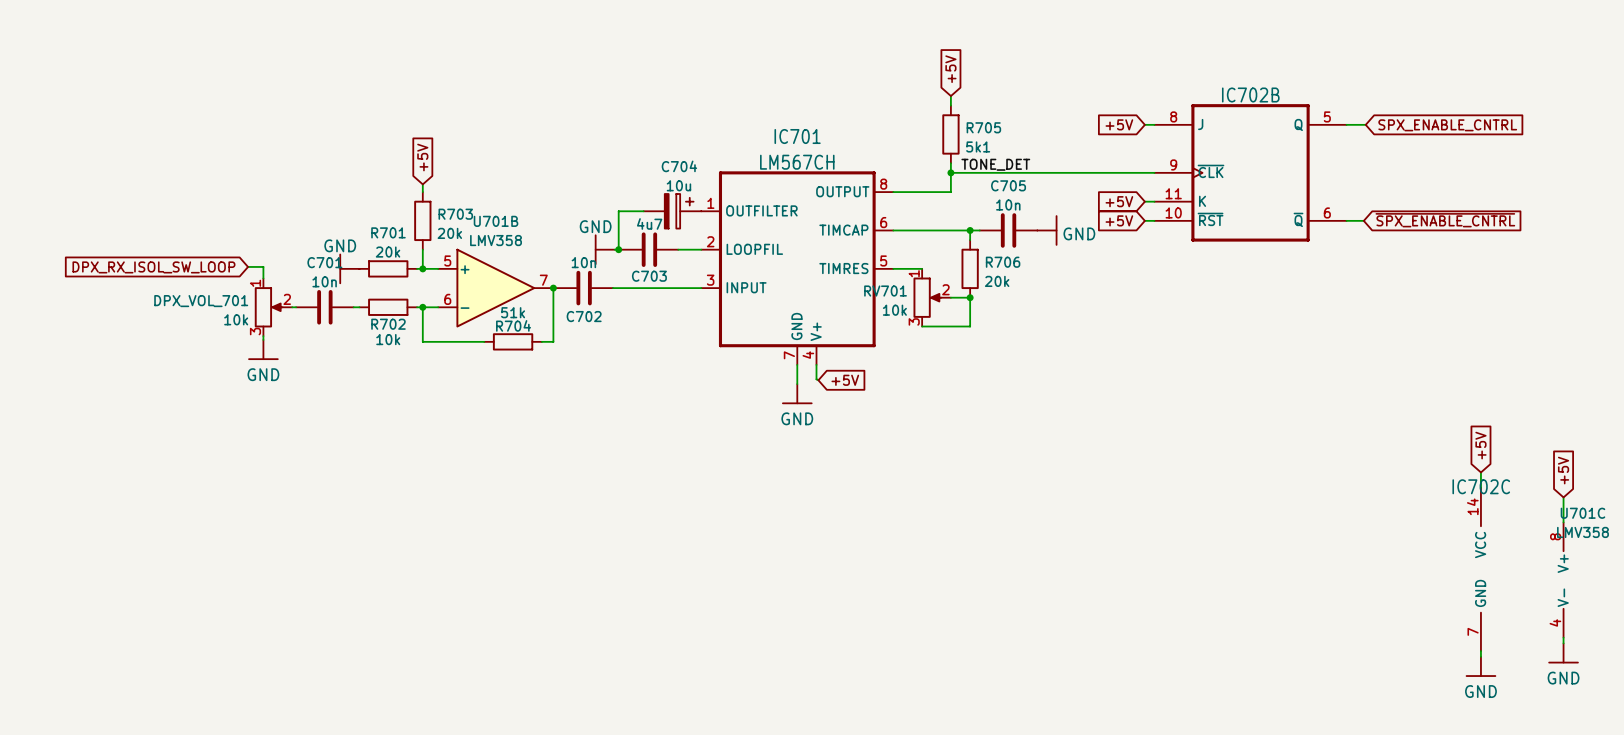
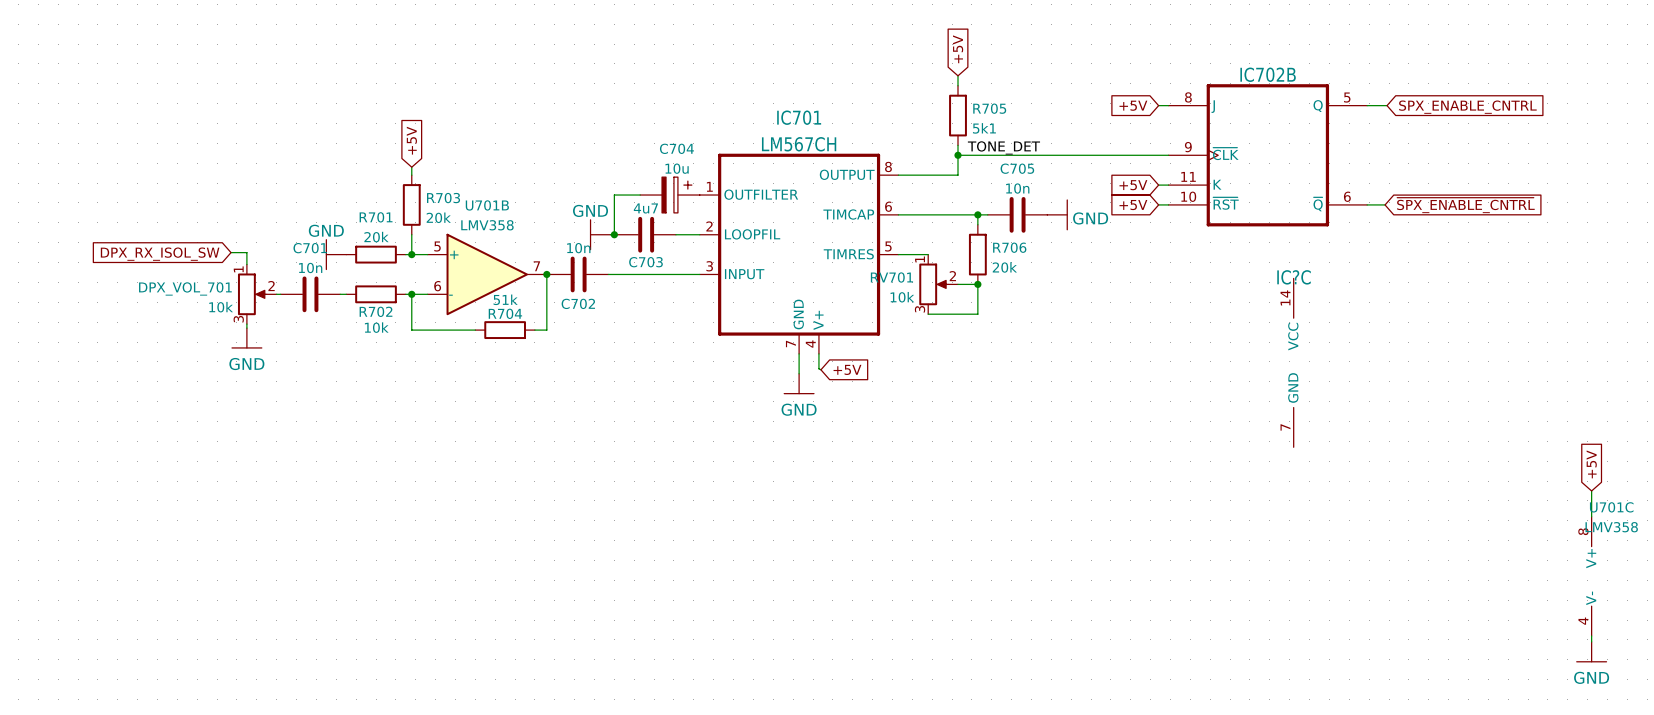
global label: DPX_RX_ISOL_SW_LOOP (153, 267) -> DPX_RX_ISOL_SW (160, 254)
IC?C: none -> (1293, 362)
global label: +5V (1480, 445) -> none
wire: (1480, 472) (1480, 487) -> none
IC702C: (1480, 569) -> none
wire: (1480, 651) (1480, 656) -> none
power symbol: GND (1480, 666) -> none

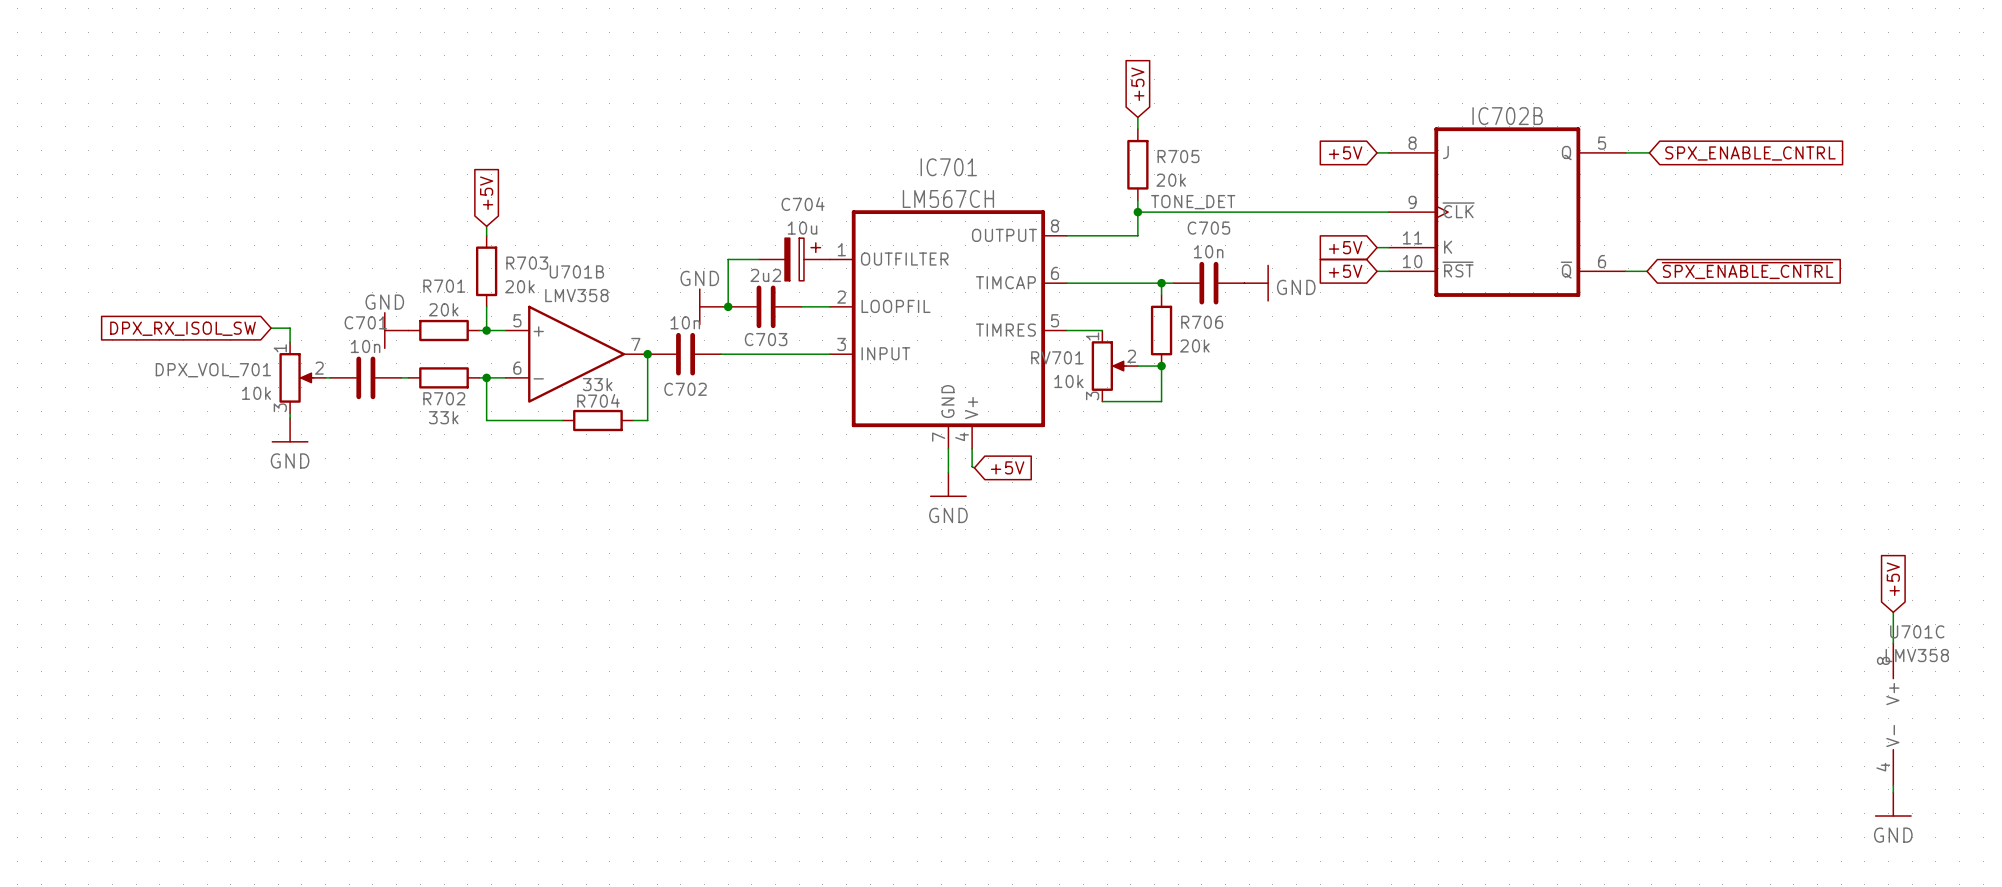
R705 value: 5k1 (984, 128) -> 20k (1171, 180)
C703 value: 4u7 (645, 208) -> 2u2 (765, 275)
R704 value: 51k (505, 299) -> 33k (597, 384)
R702 value: 10k (376, 327) -> 33k (443, 417)
IC?C: (1293, 362) -> none

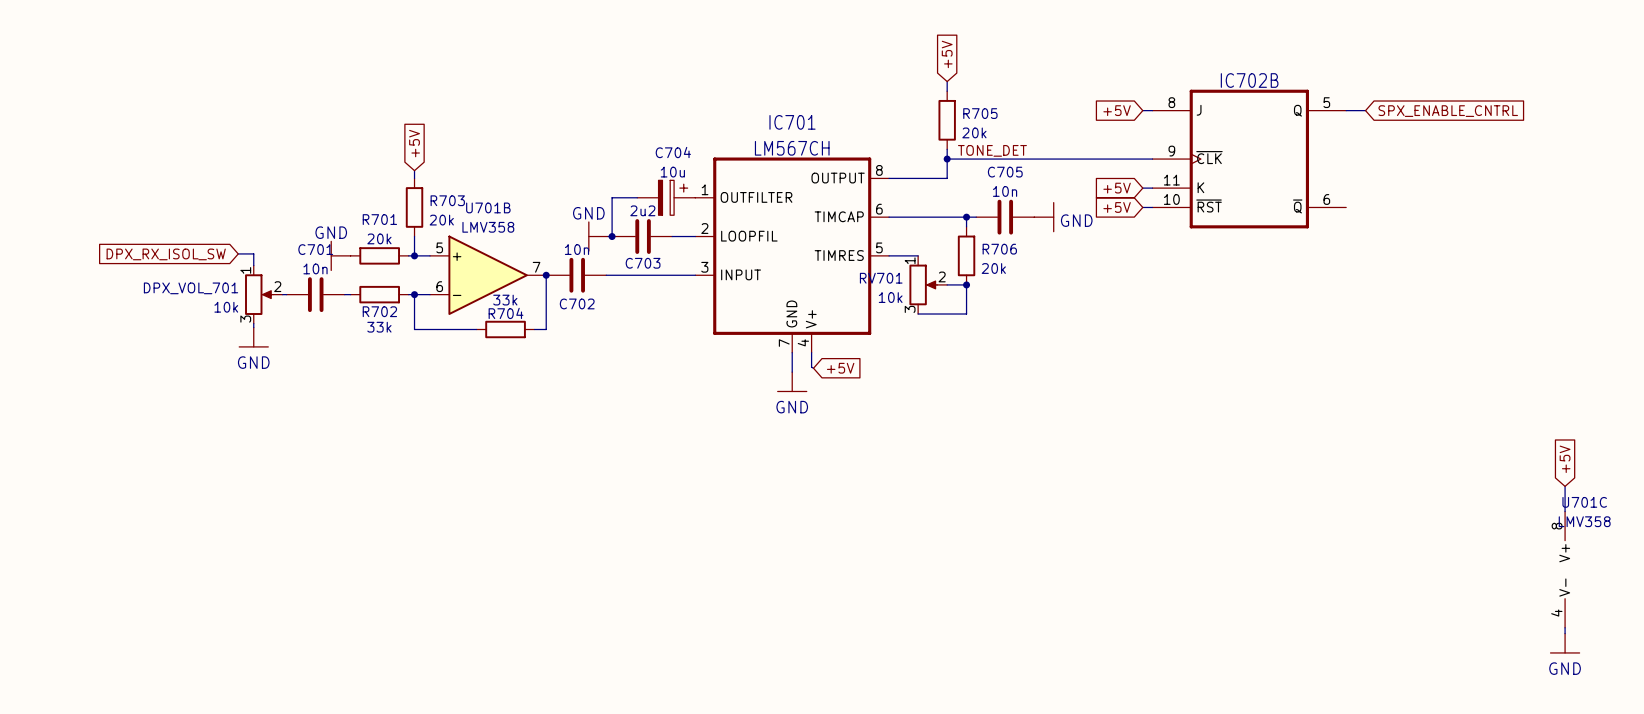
global label: ~{SPX_ENABLE_CNTRL} (1747, 270) -> none
wire: (1625, 271) (1647, 271) -> none

